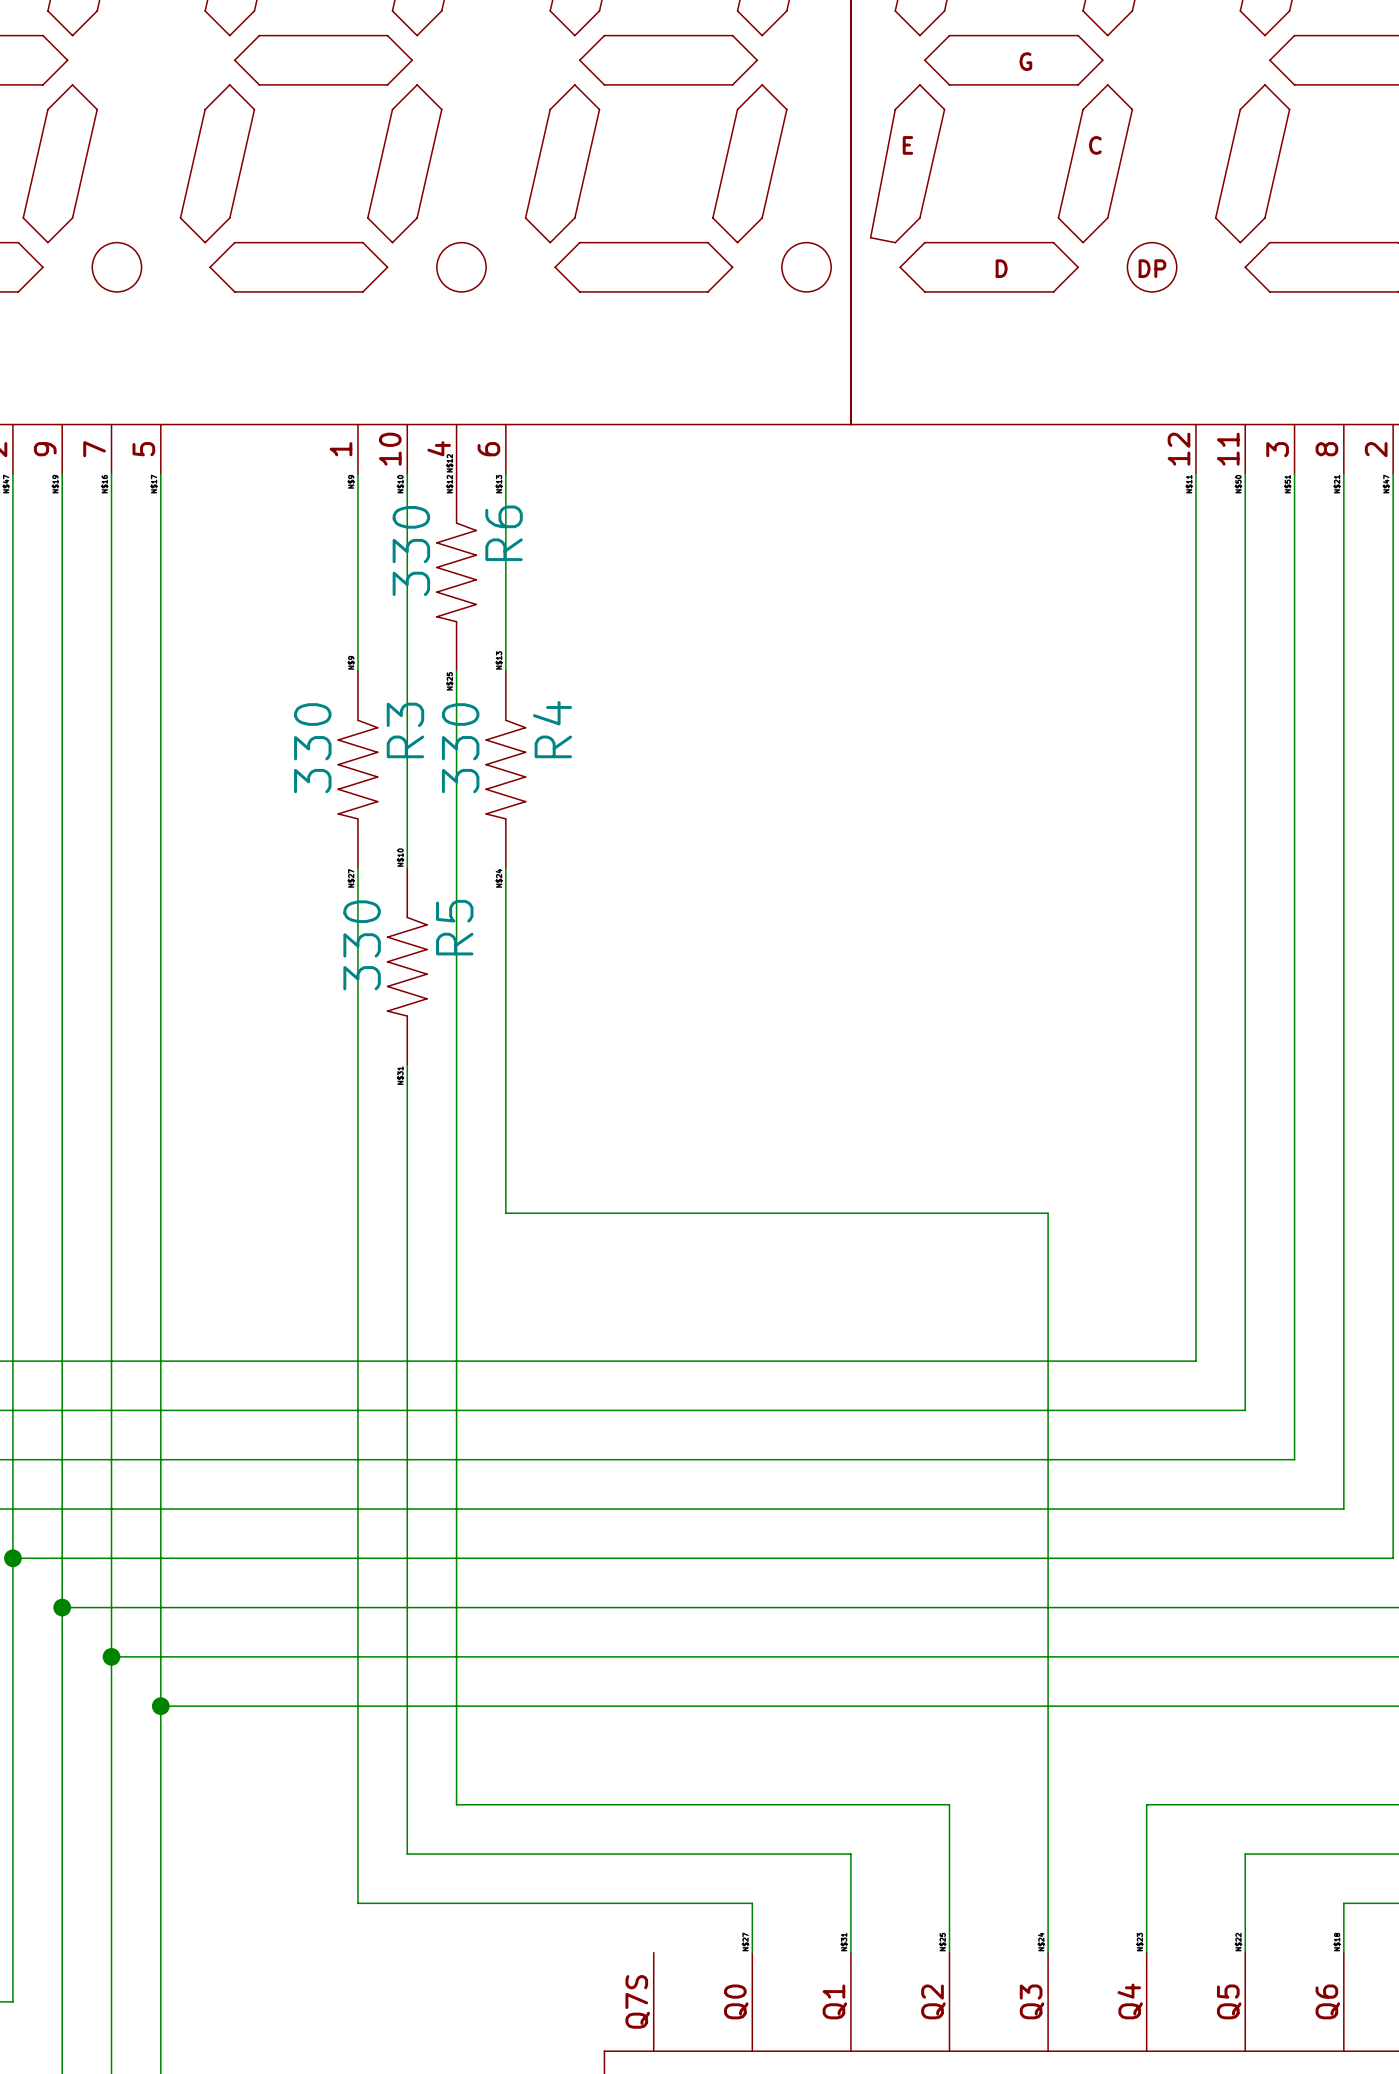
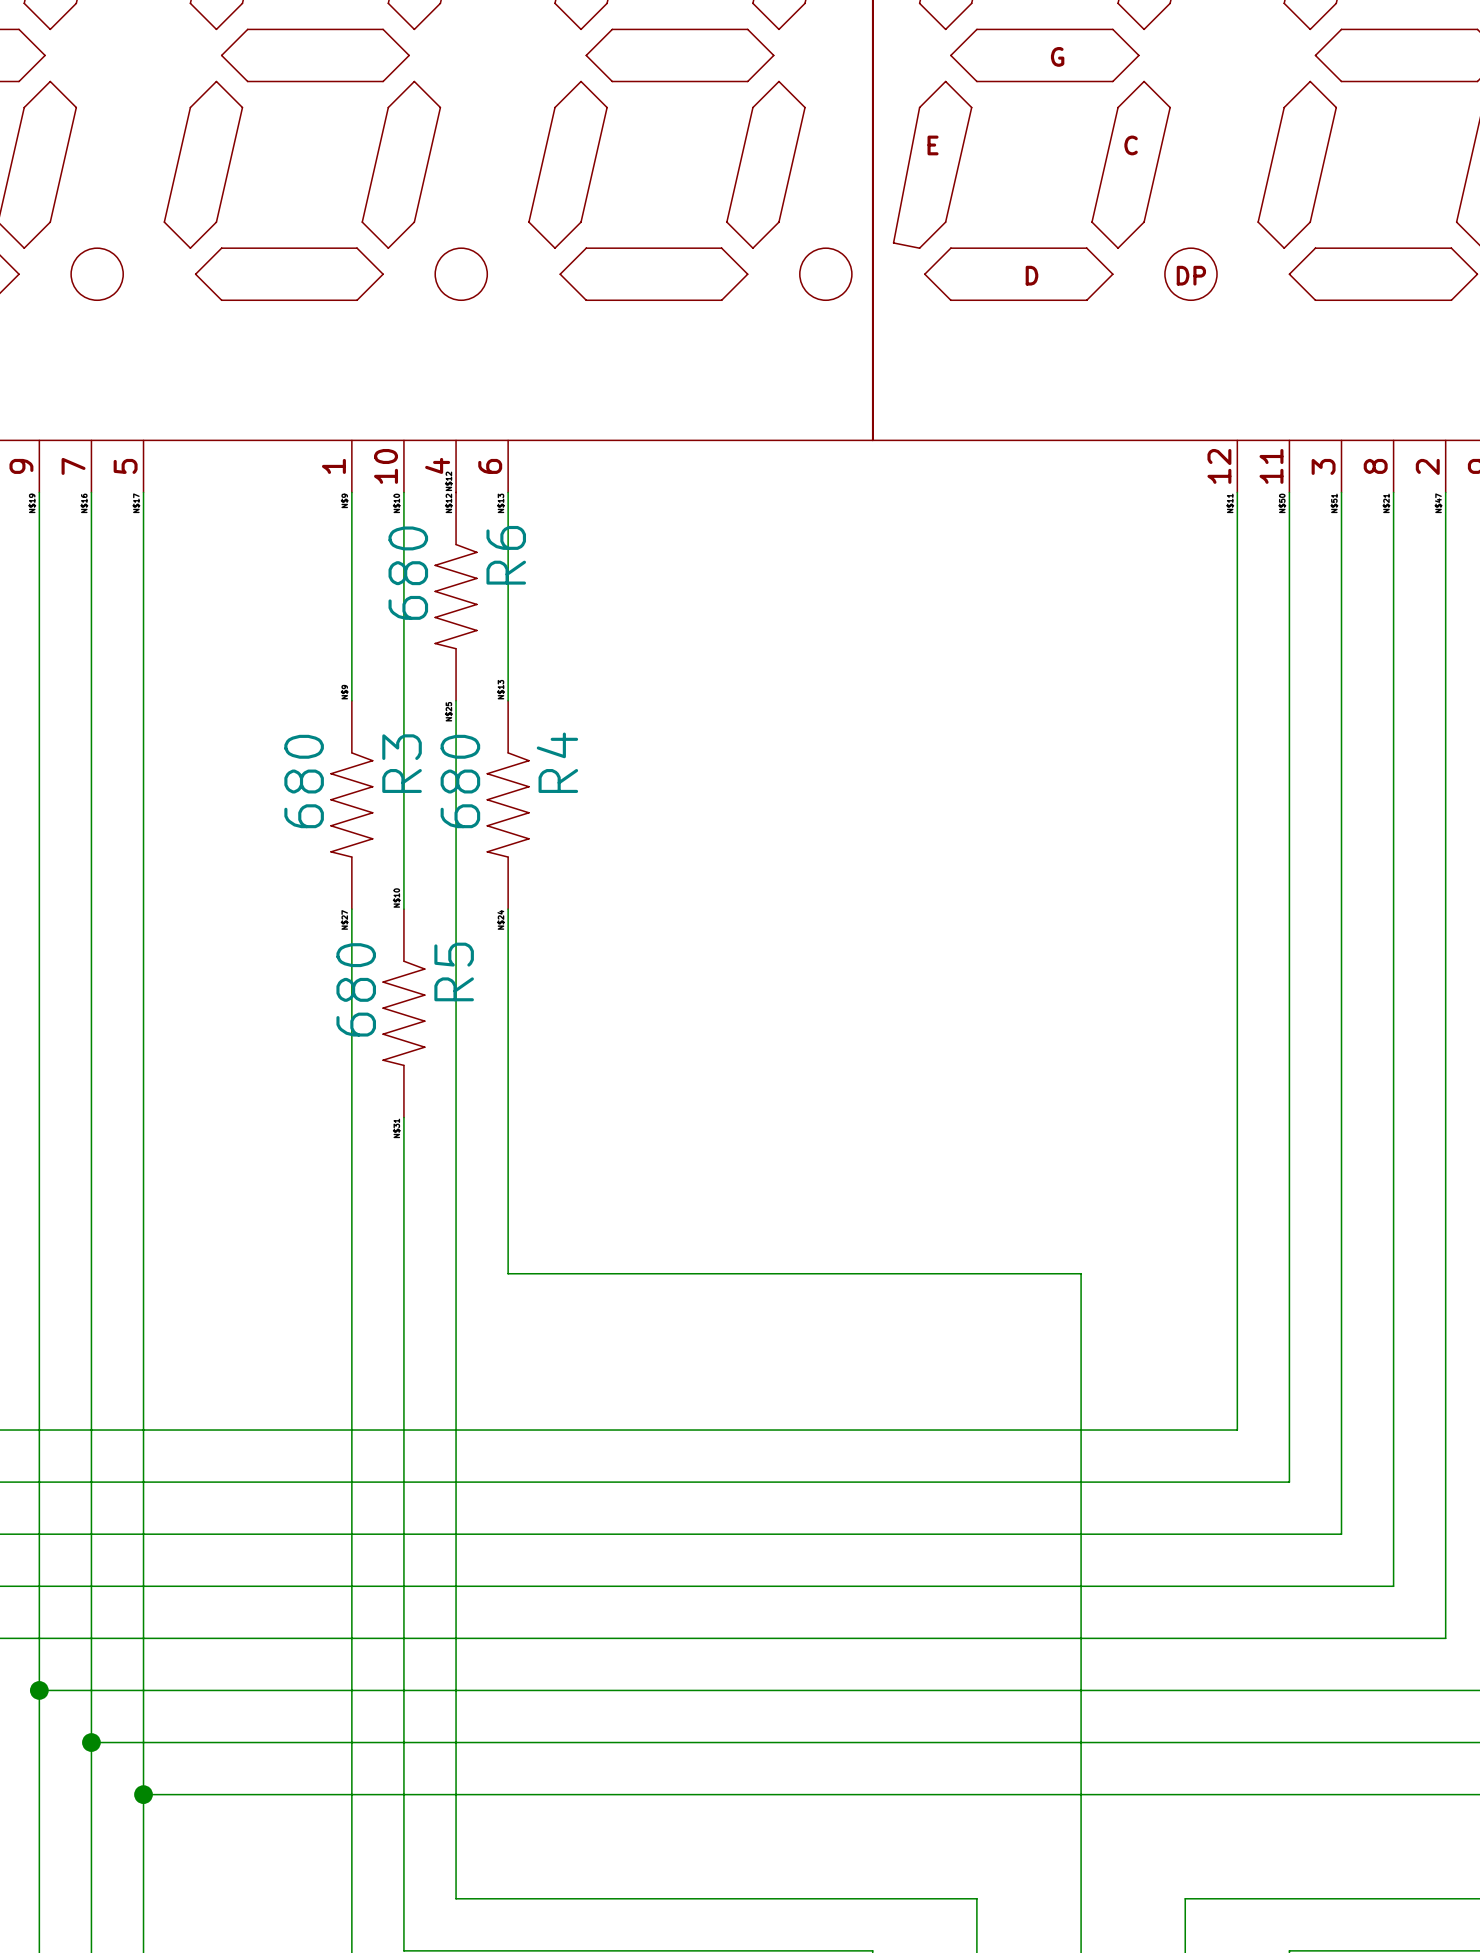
R6 value: 330 (411, 551) -> 680 (408, 573)
R3 value: 330 (312, 748) -> 680 (304, 781)
R4 value: 330 (460, 748) -> 680 (460, 781)
R5 value: 330 (362, 945) -> 680 (356, 989)

